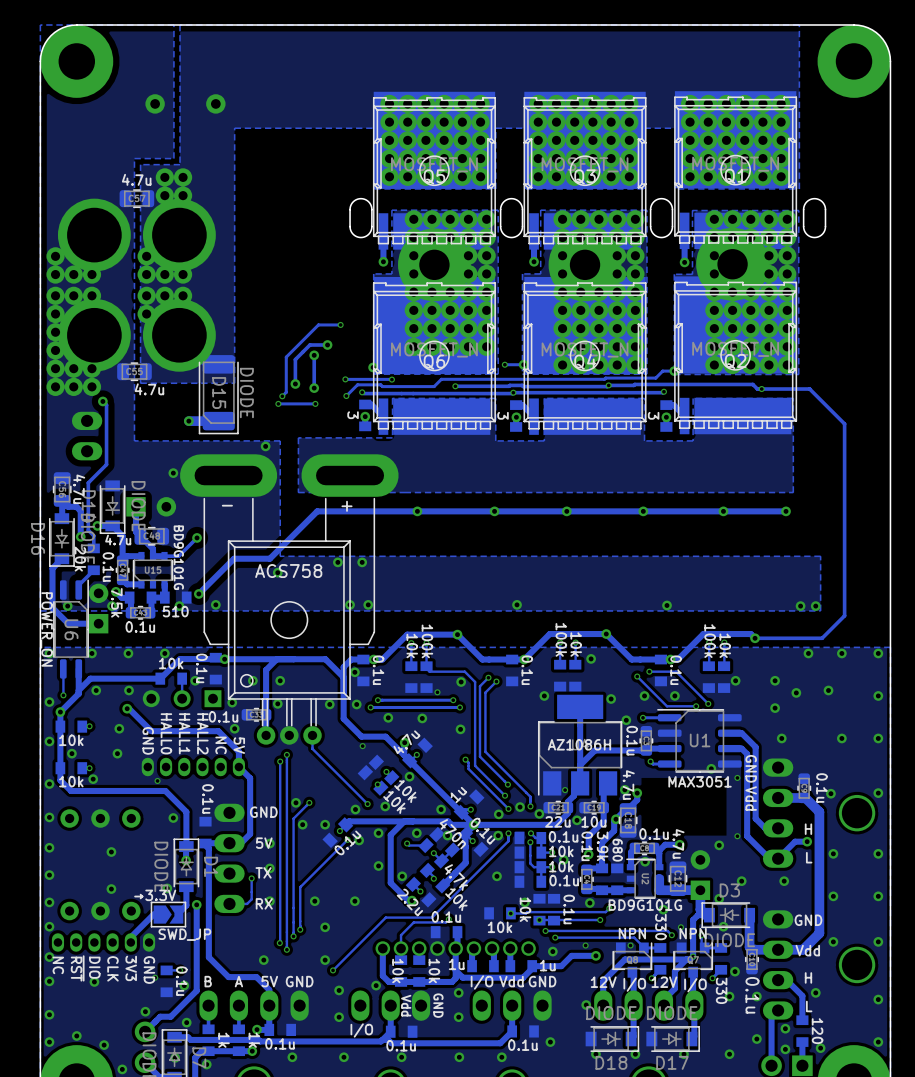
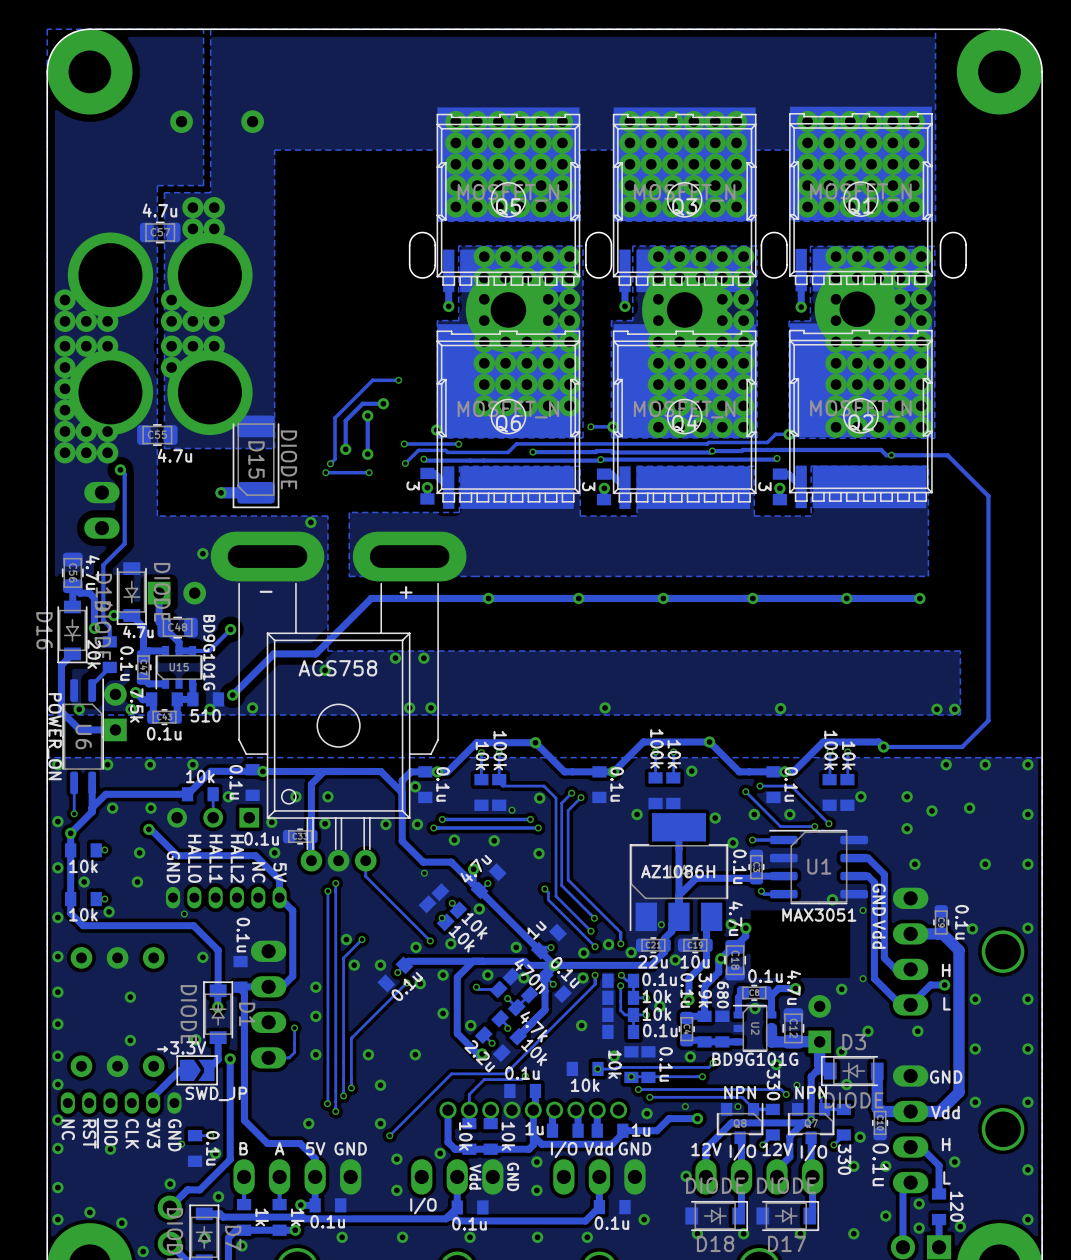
text: GND (263, 812) -> none
text: 5V (264, 843) -> none
text: TX (263, 872) -> none
text: RX (264, 903) -> none

